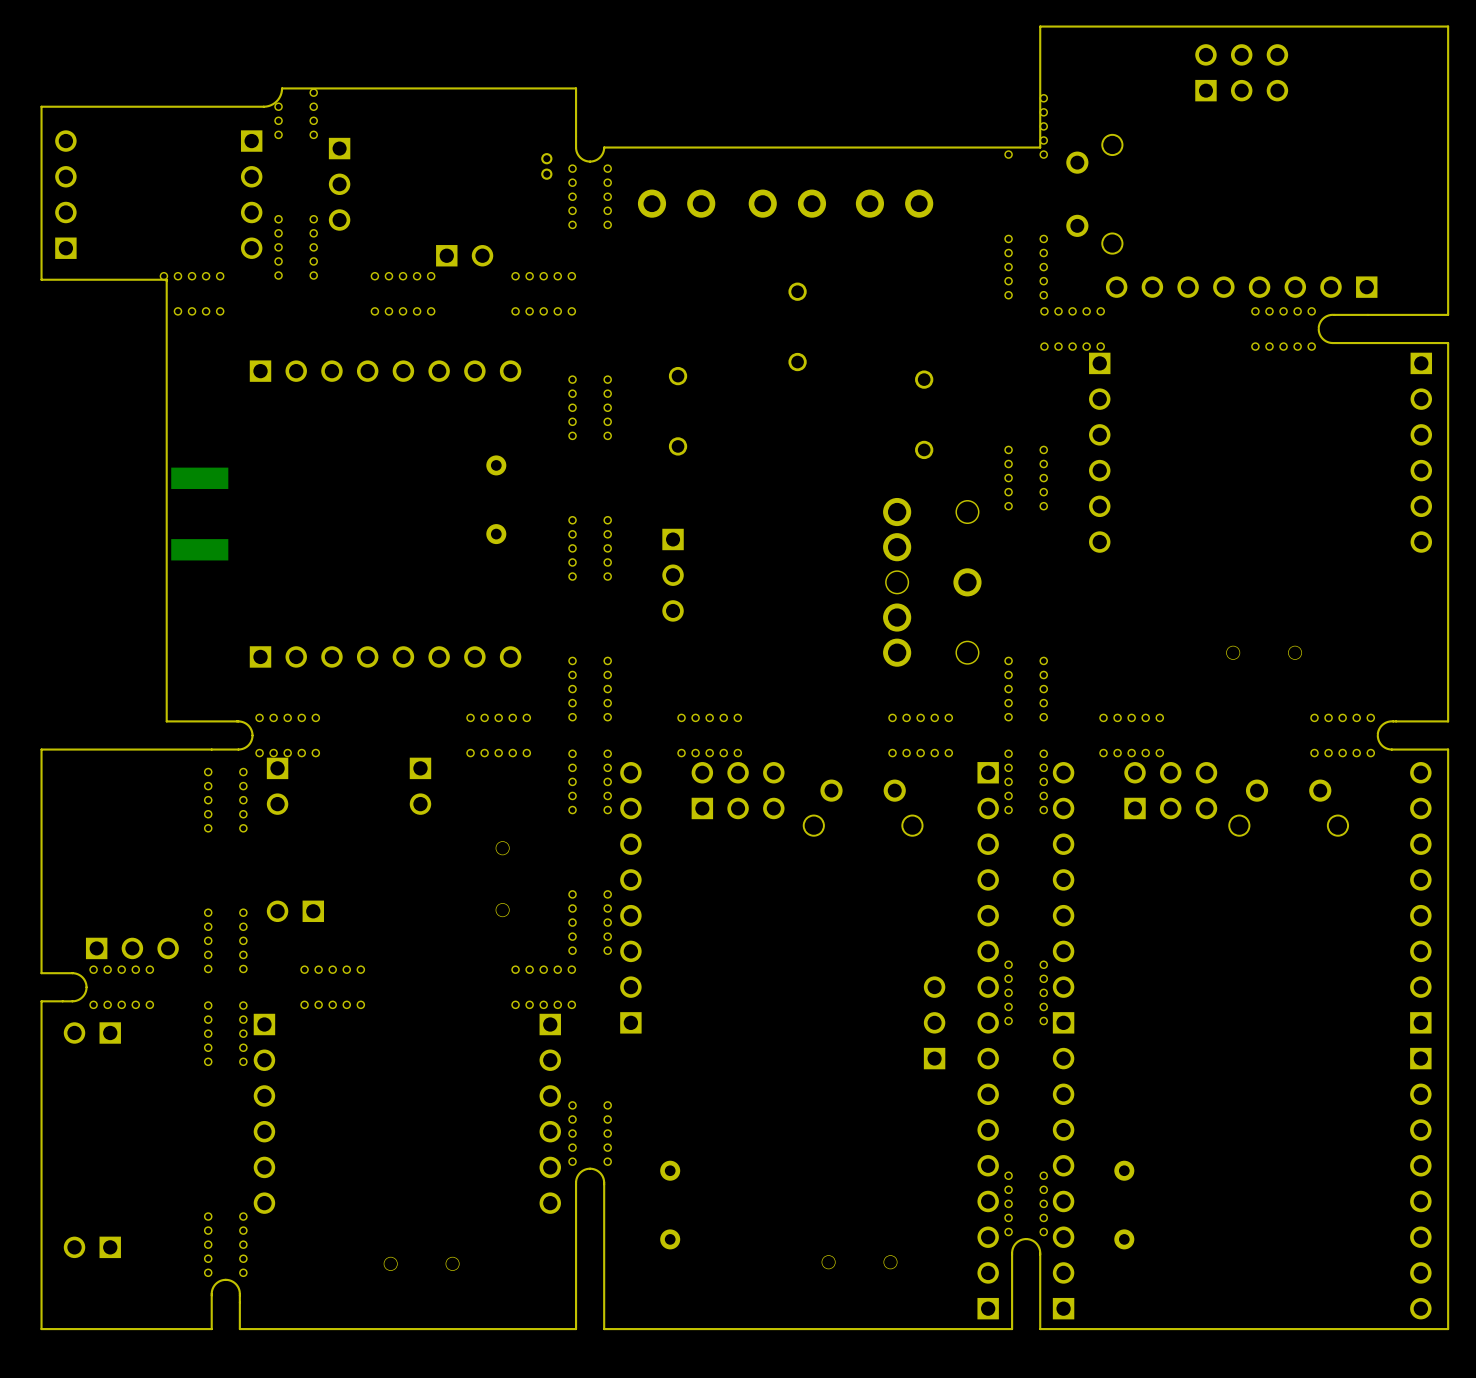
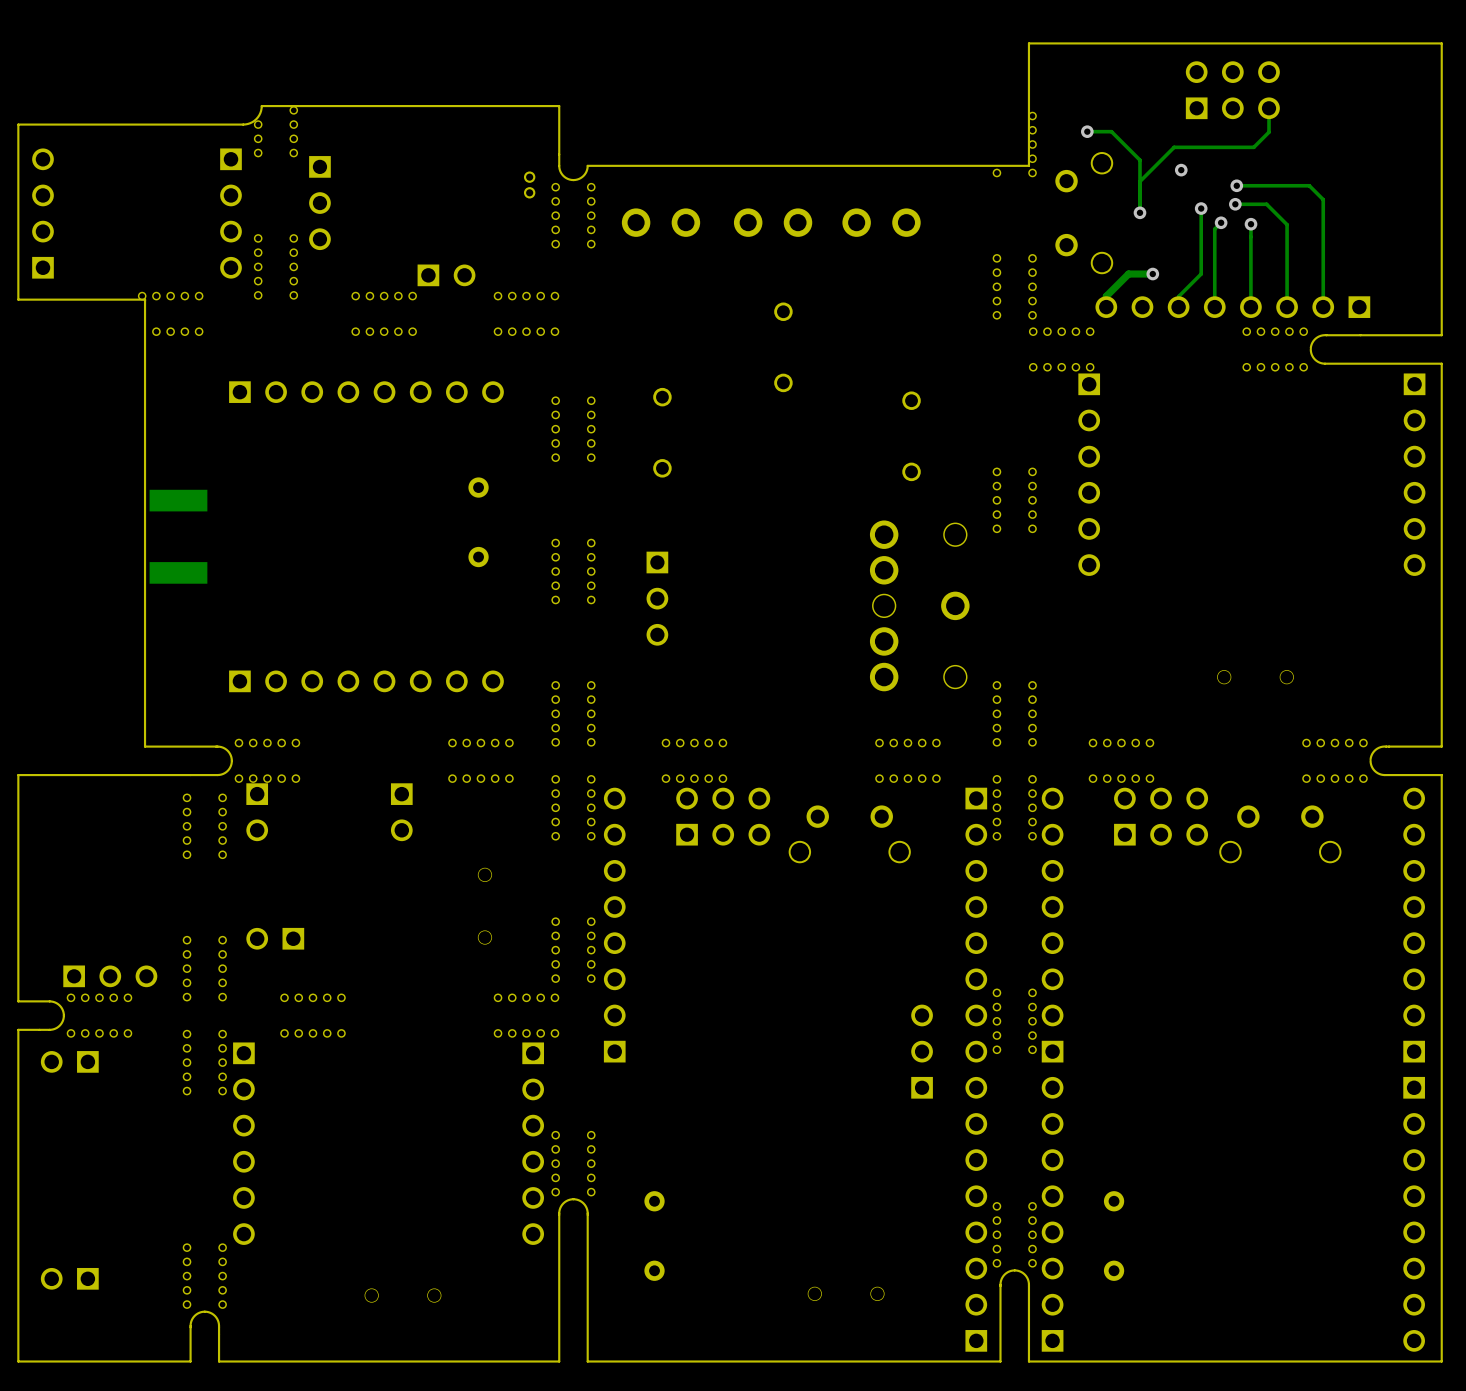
track: none -> (1269, 108) (1269, 132) (1253, 147) (1174, 147) (1139, 181)
track: none -> (1087, 131) (1111, 131) (1139, 160) (1139, 212)
via: none -> (1087, 131)
via: none -> (1181, 170)
track: none -> (1236, 185) (1309, 185) (1323, 199) (1323, 307)
via: none -> (1236, 185)
track: none -> (1235, 204) (1266, 204) (1287, 224) (1287, 307)
via: none -> (1235, 204)
track: none -> (1201, 208) (1201, 274) (1178, 296) (1178, 307)
via: none -> (1201, 208)
via: none -> (1139, 212)
track: none -> (1221, 222) (1214, 229) (1214, 307)
via: none -> (1221, 222)
track: none -> (1251, 224) (1250, 307)
via: none -> (1251, 224)
track: none -> (1152, 274) (1128, 274) (1106, 296) (1106, 307)
via: none -> (1152, 274)

